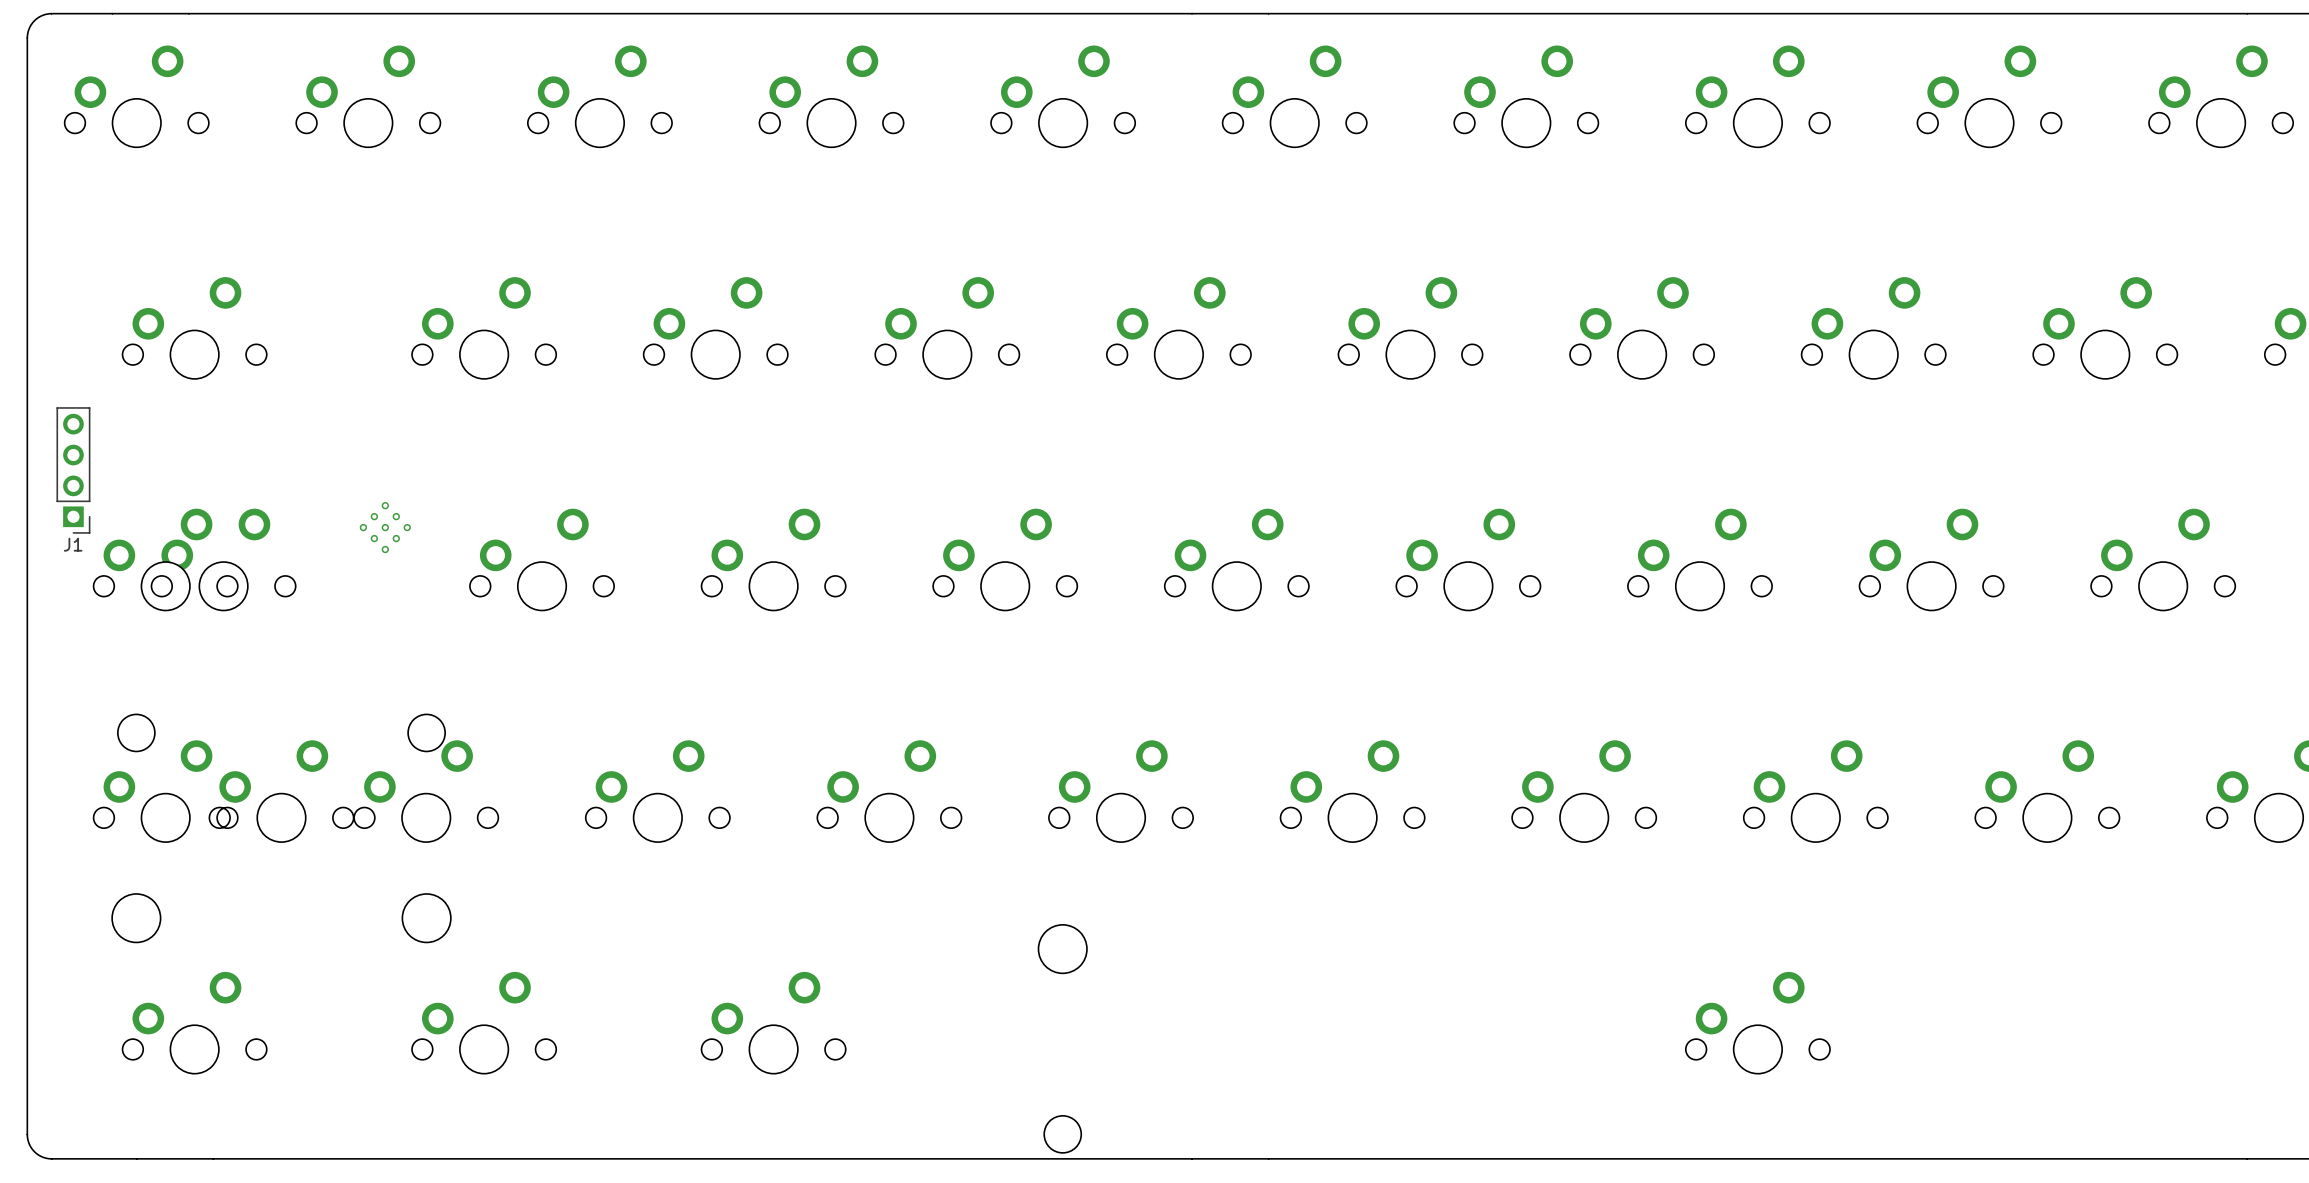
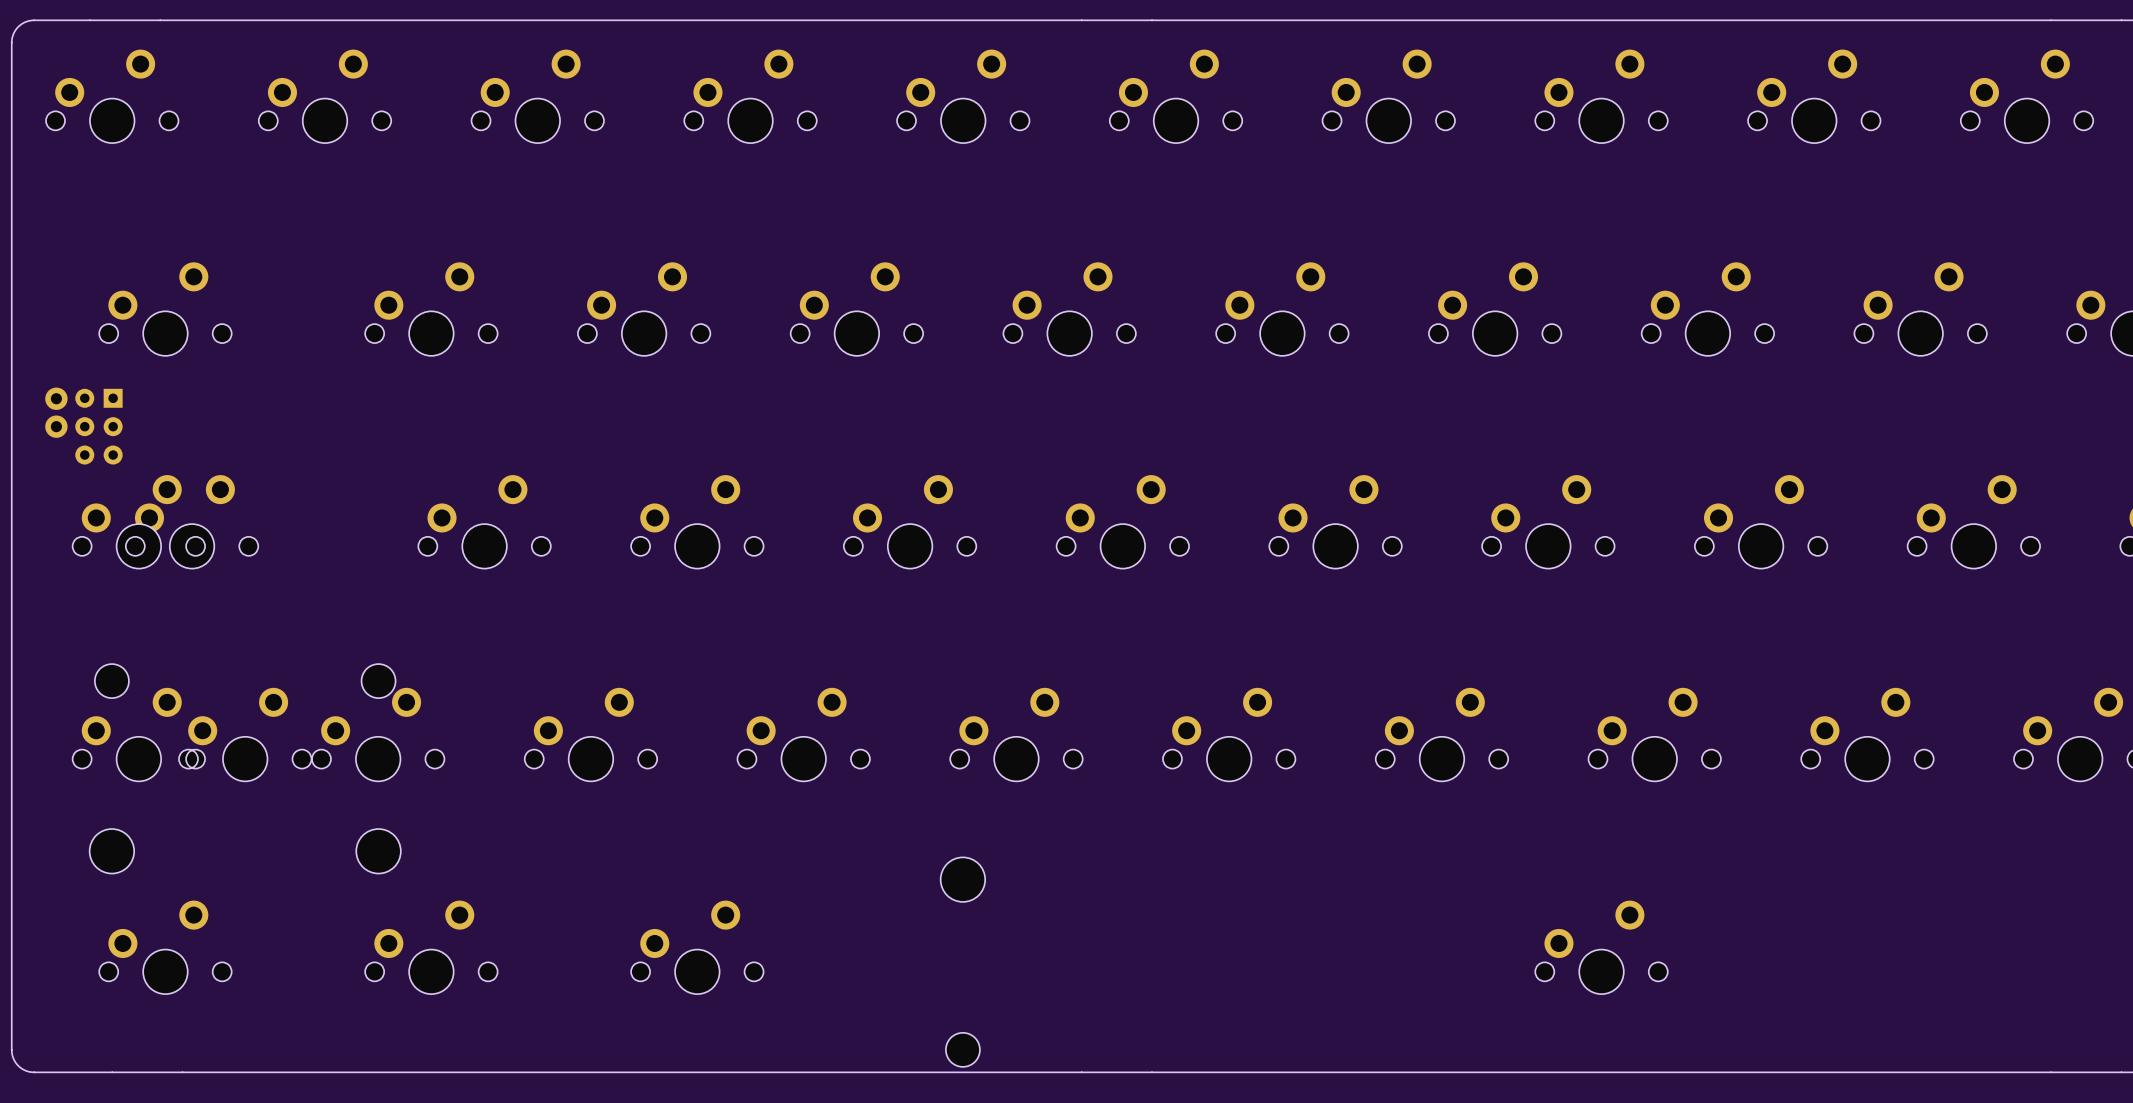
part: none -> (56, 398)
part: none -> (56, 426)
part: none -> (98, 426)
J1: (73, 470) -> none
part: (385, 527) -> none

